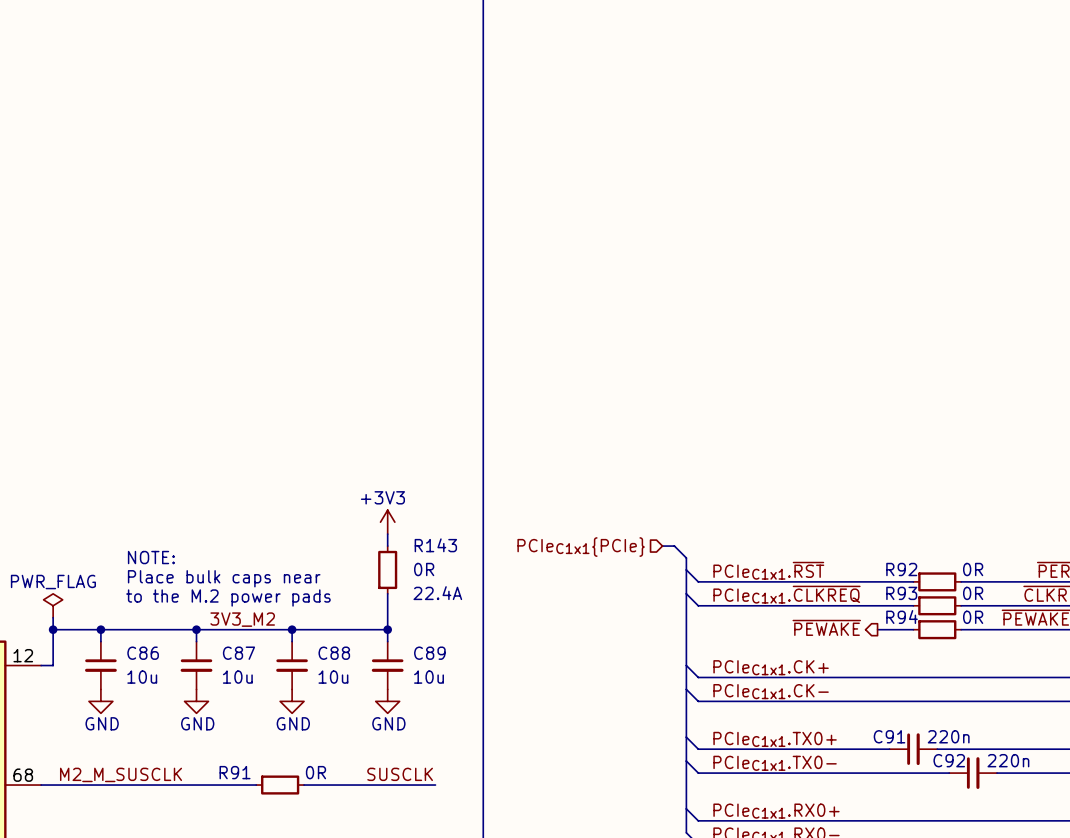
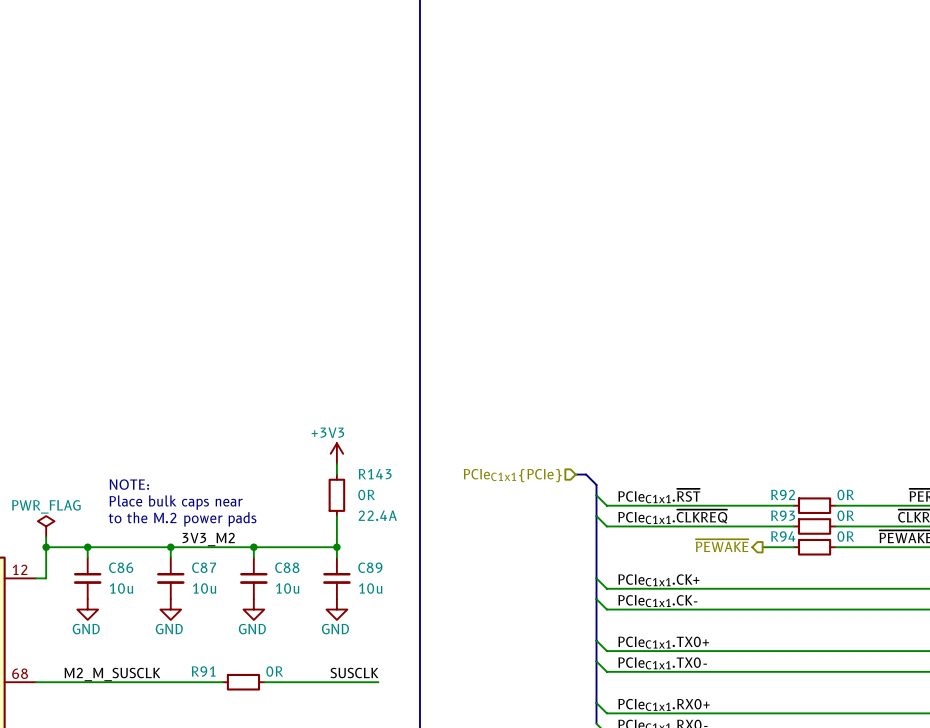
C91: (913, 749) -> none
C92: (973, 773) -> none

